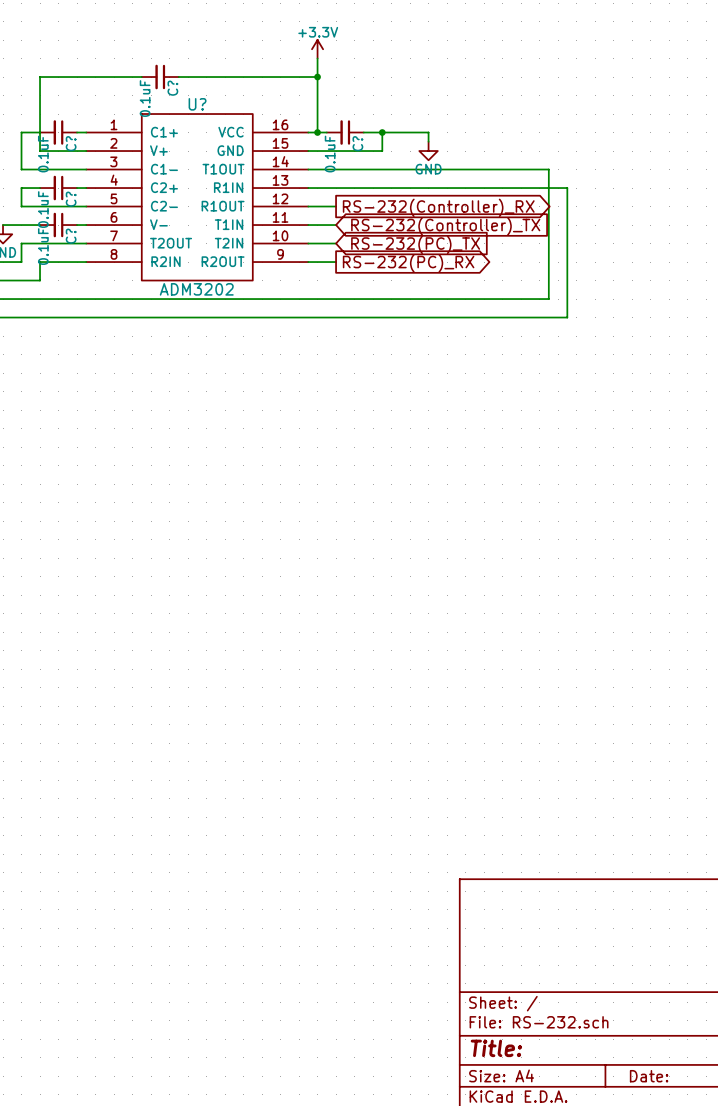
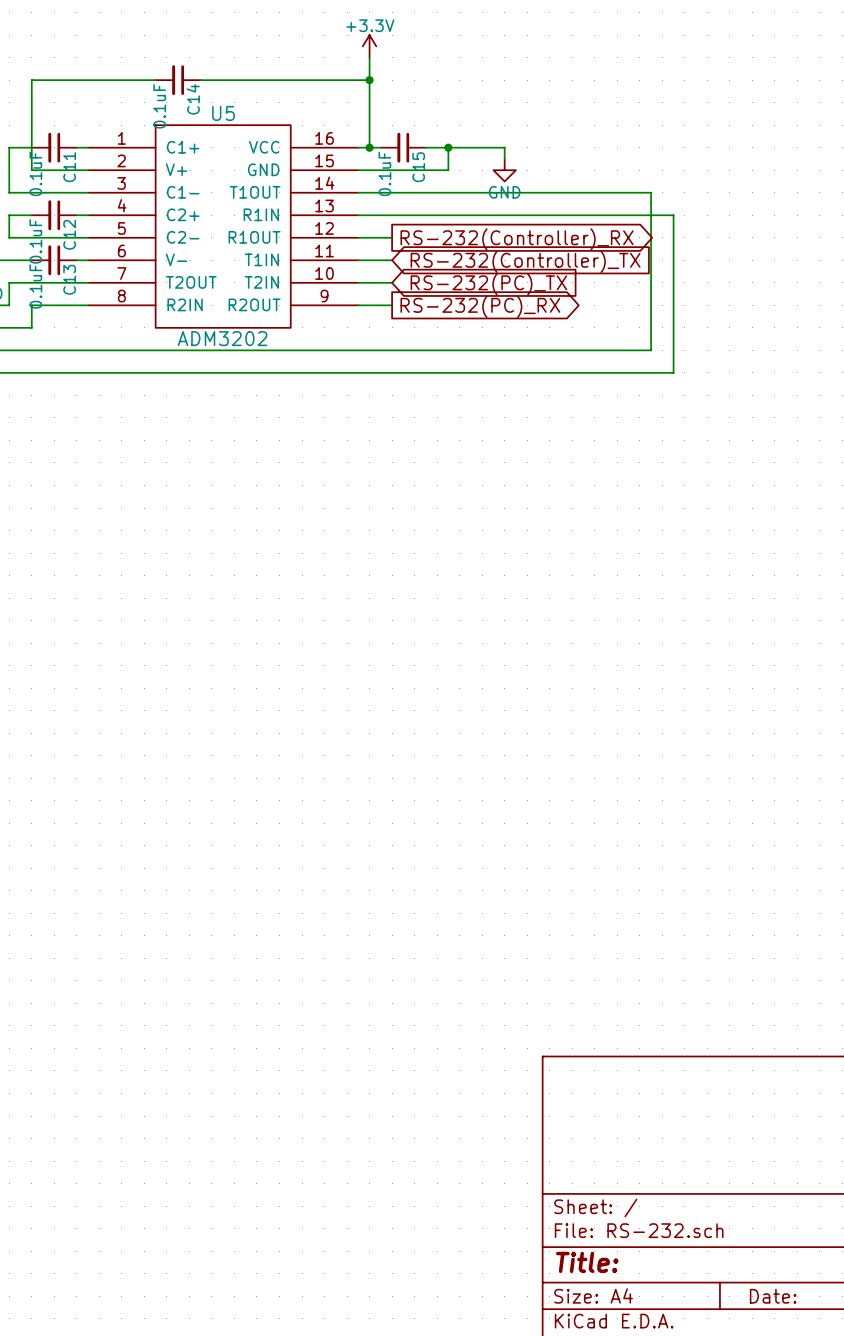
C? name: C? (172, 88) -> C14 (193, 99)
U? name: U? (197, 104) -> U5 (223, 113)
C? name: C? (71, 143) -> C11 (69, 167)
C? name: C? (357, 143) -> C15 (418, 167)
C? name: C? (71, 199) -> C12 (69, 234)
C? name: C? (71, 236) -> C13 (69, 279)

